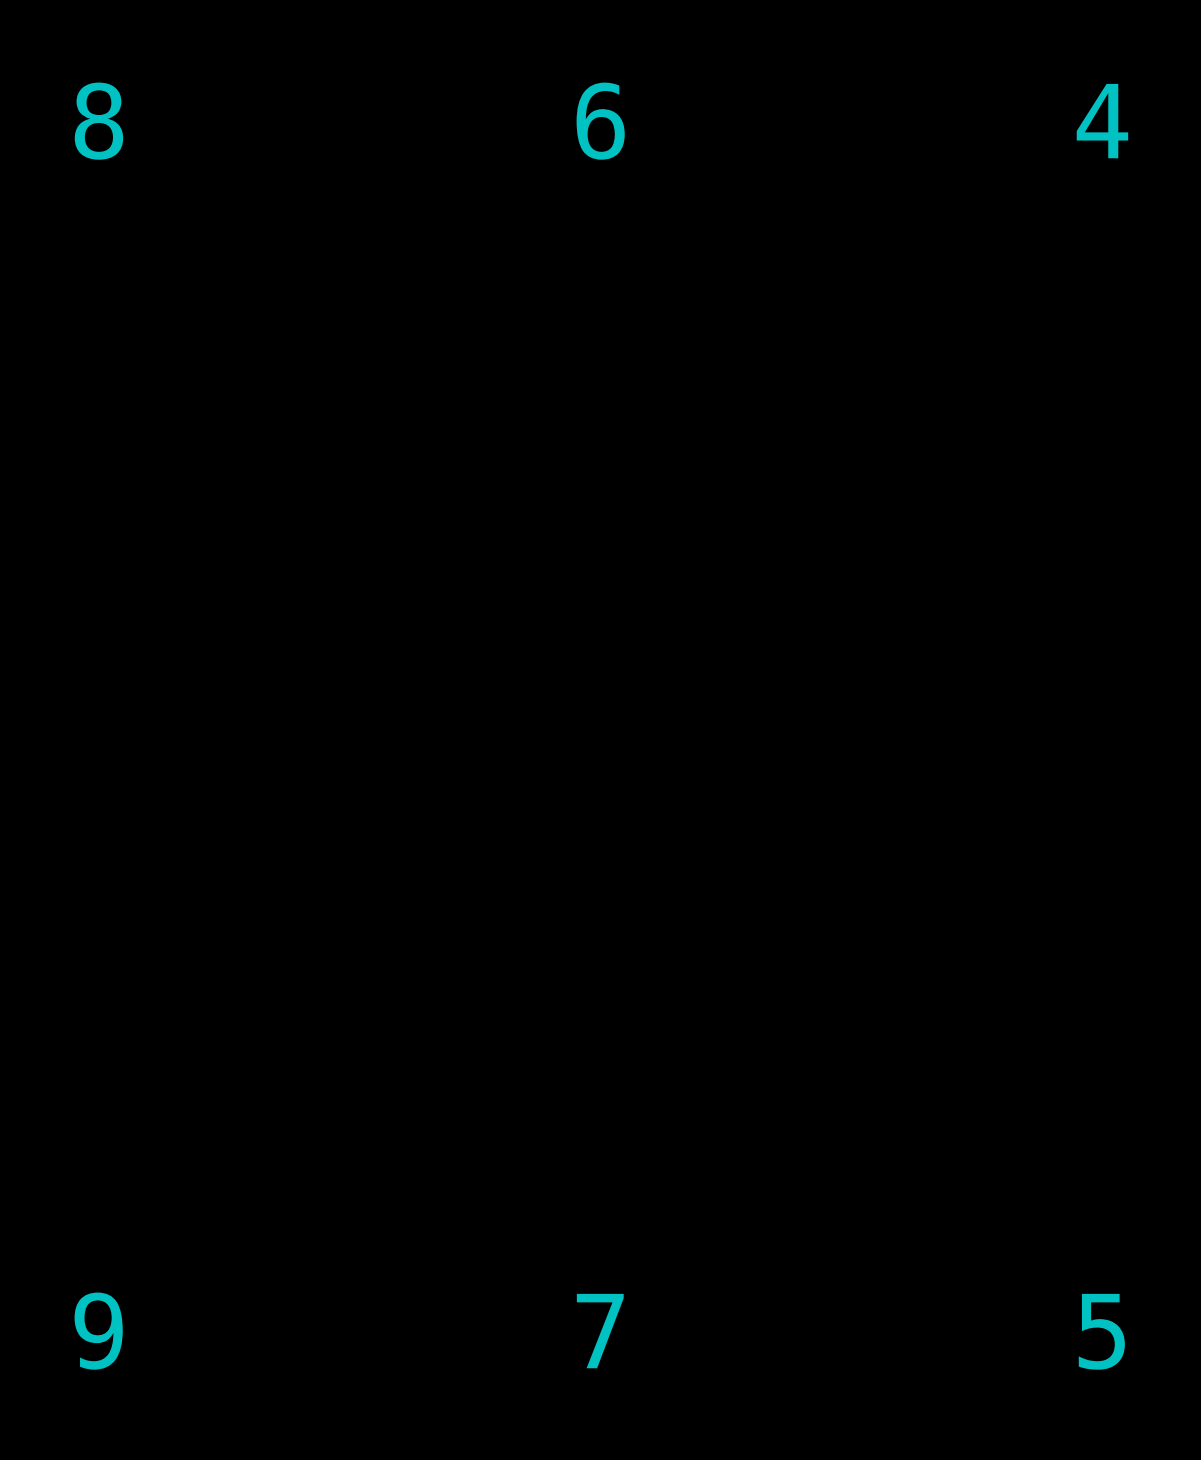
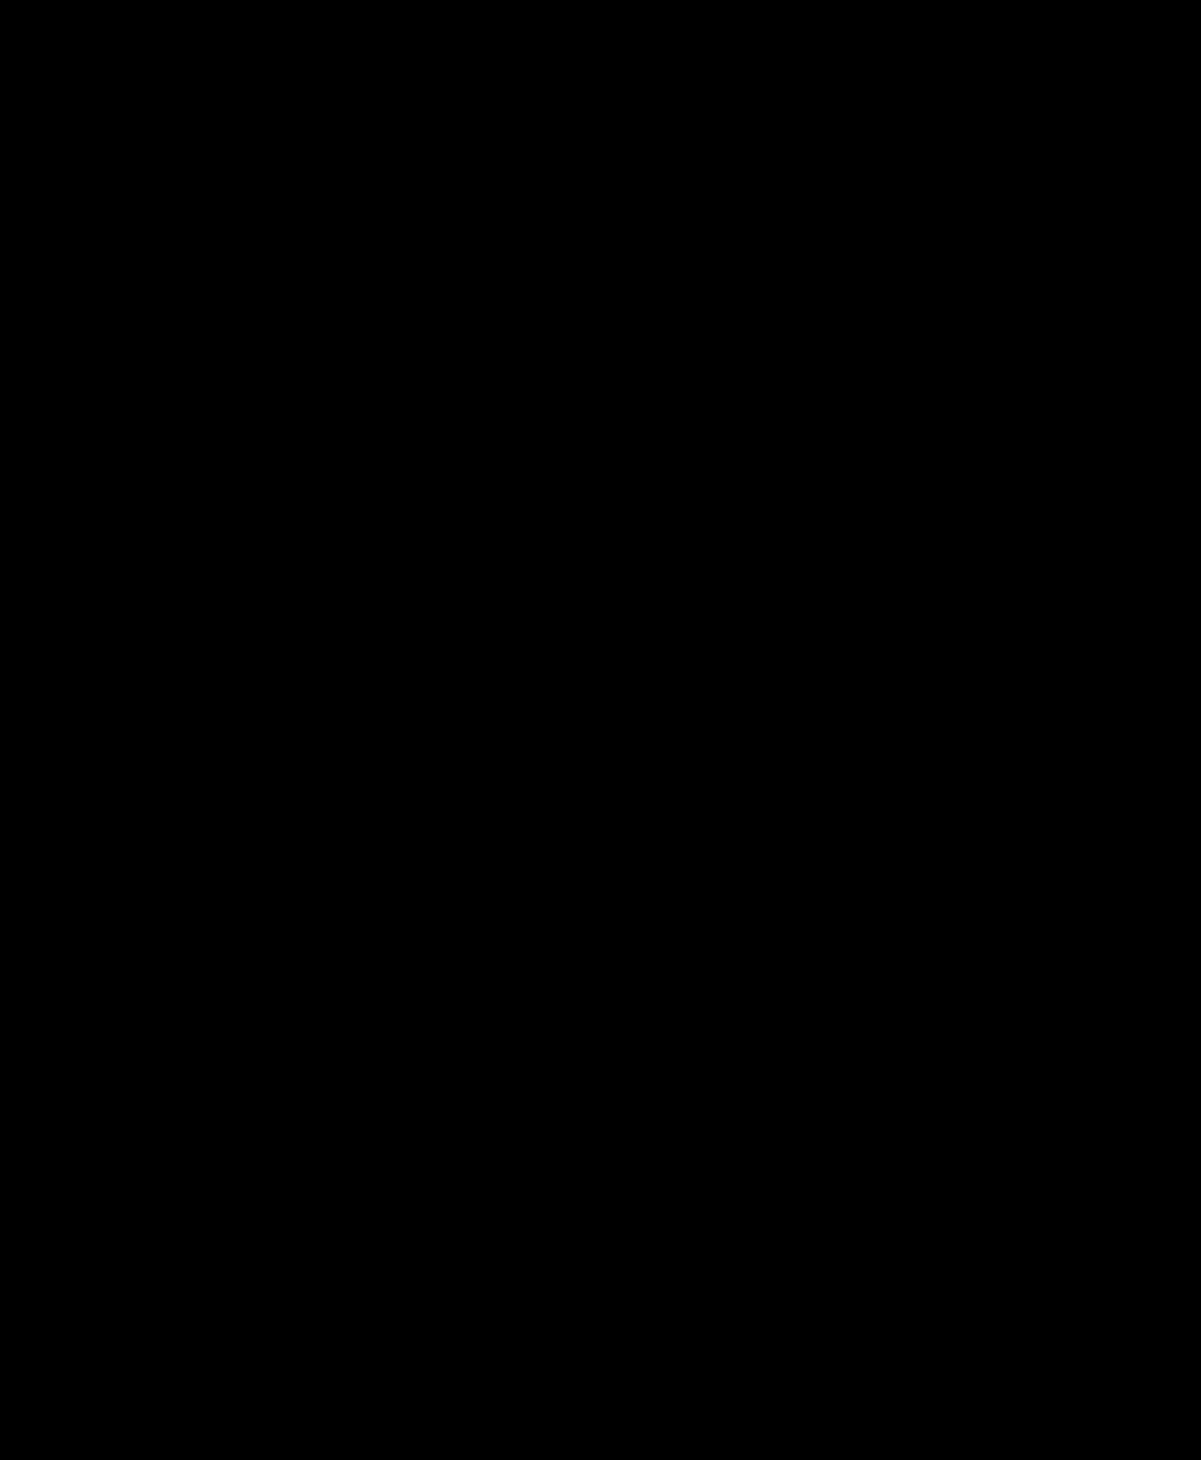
text: 8 (98, 121) -> none
text: 6 (600, 121) -> none
text: 4 (1102, 121) -> none
text: 9 (98, 1331) -> none
text: 7 (600, 1331) -> none
text: 5 (1101, 1331) -> none

